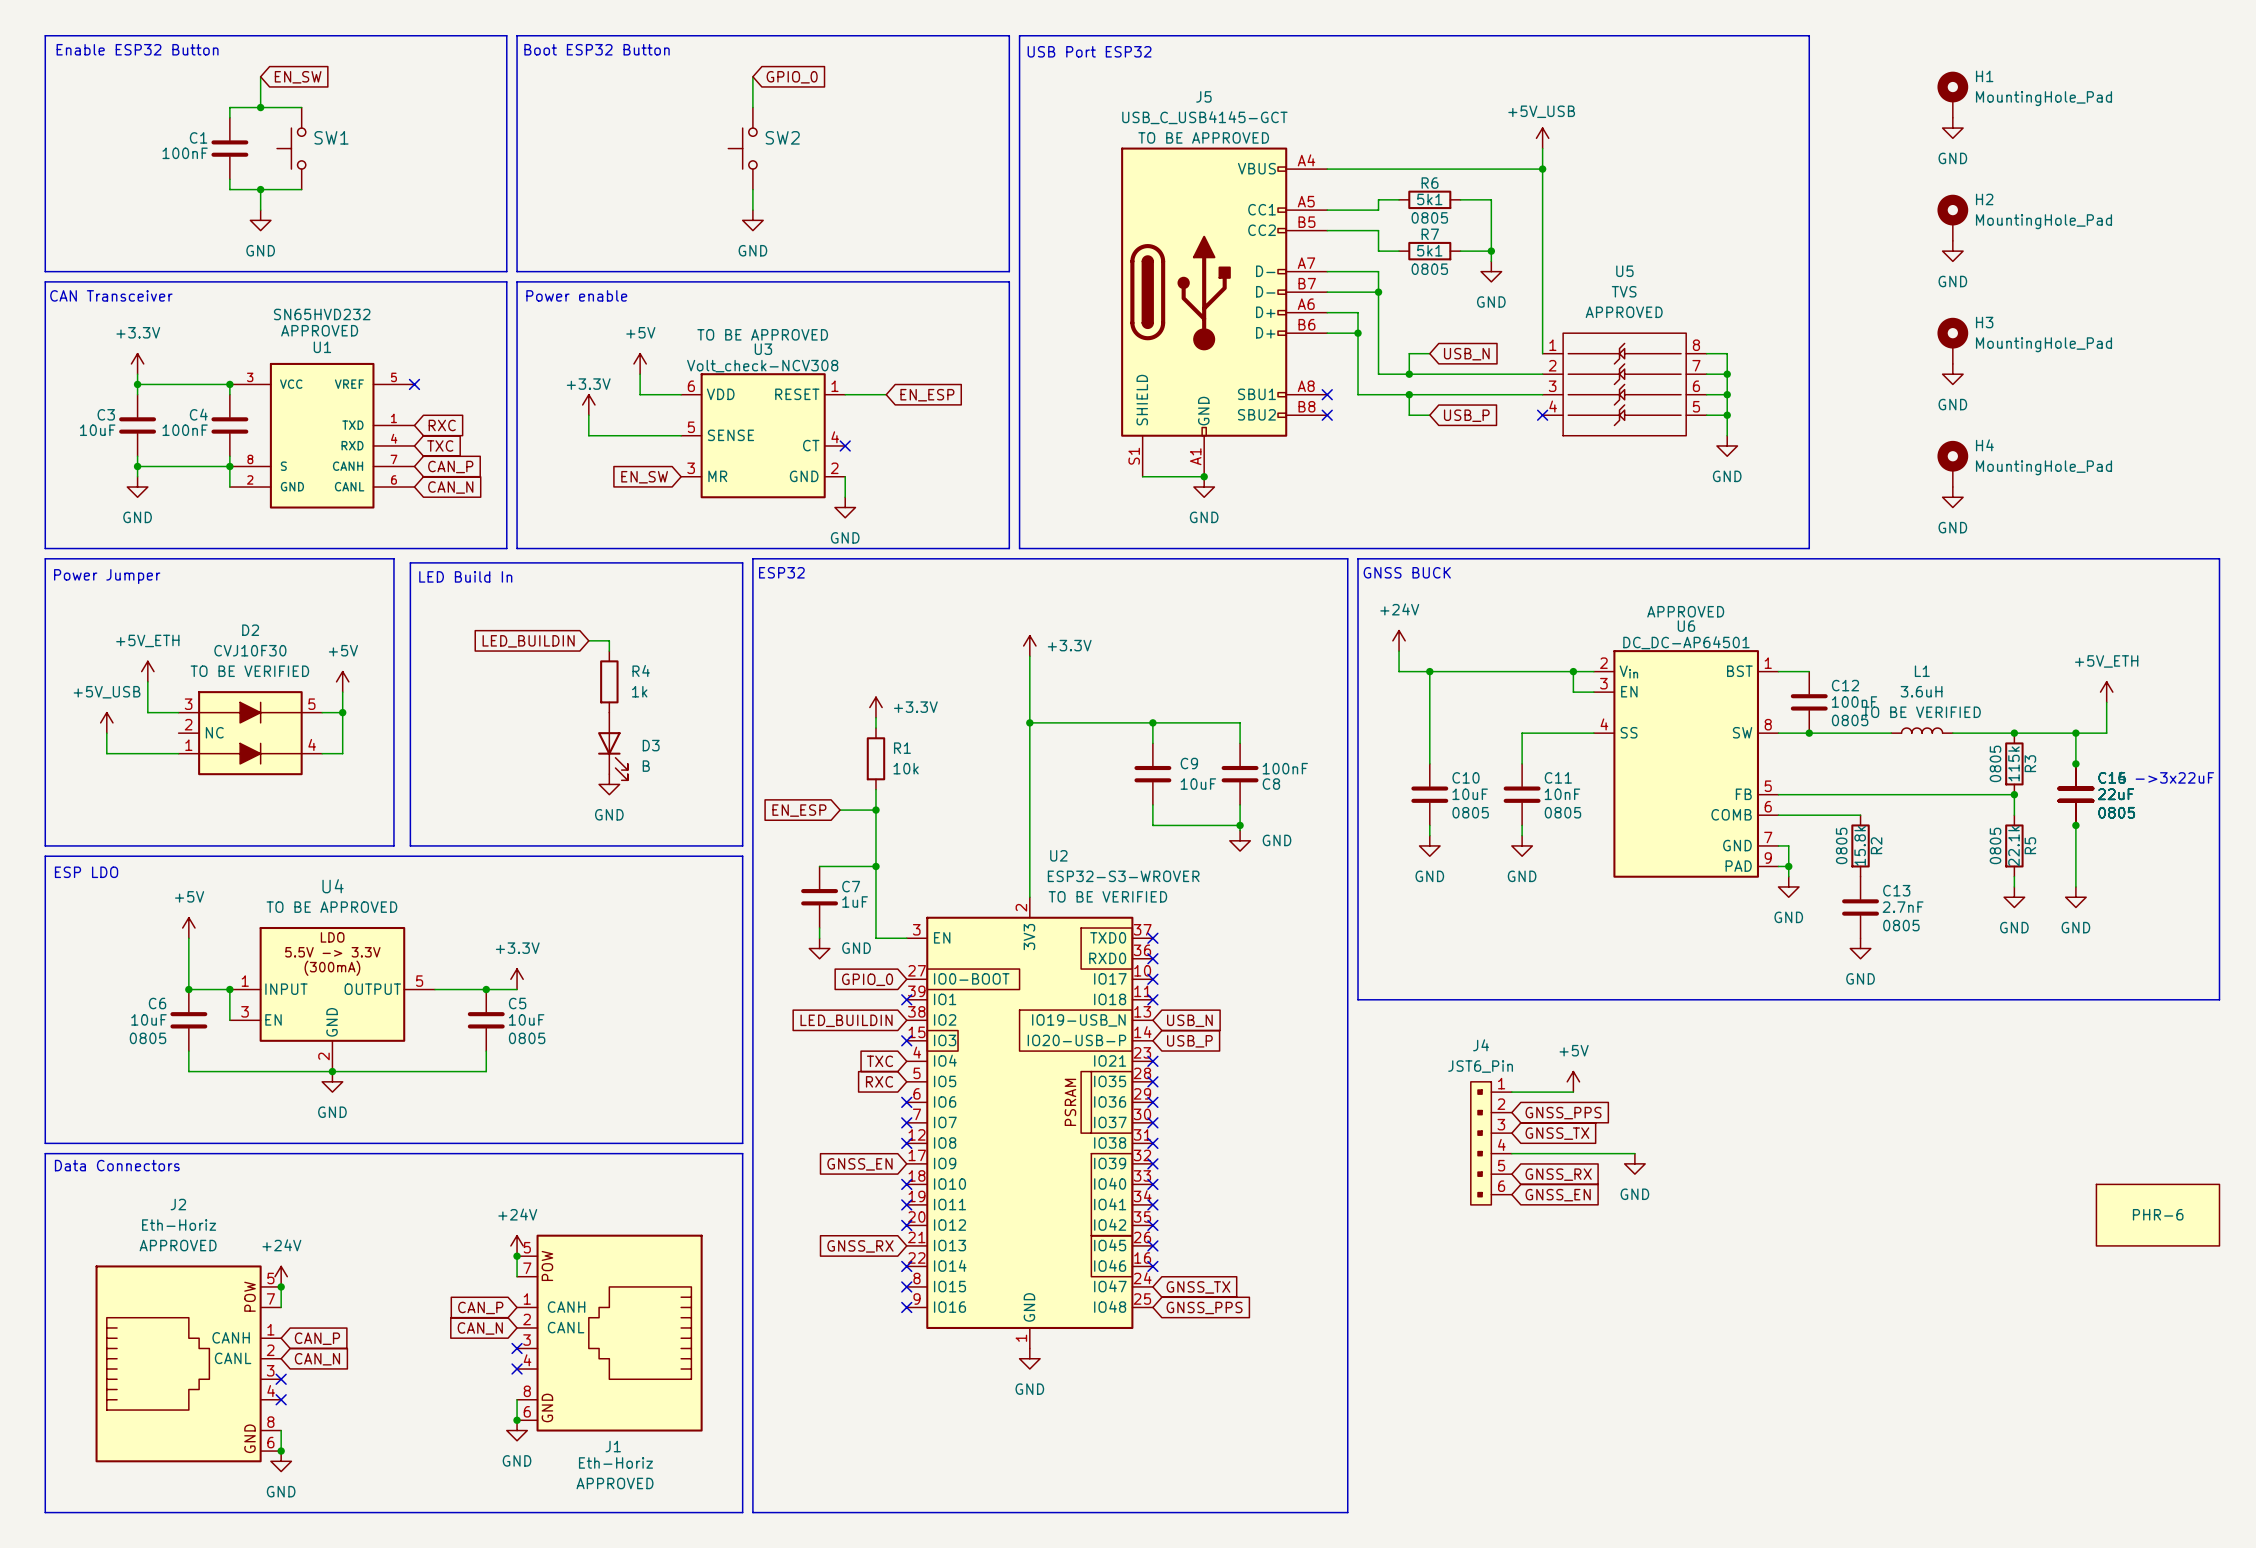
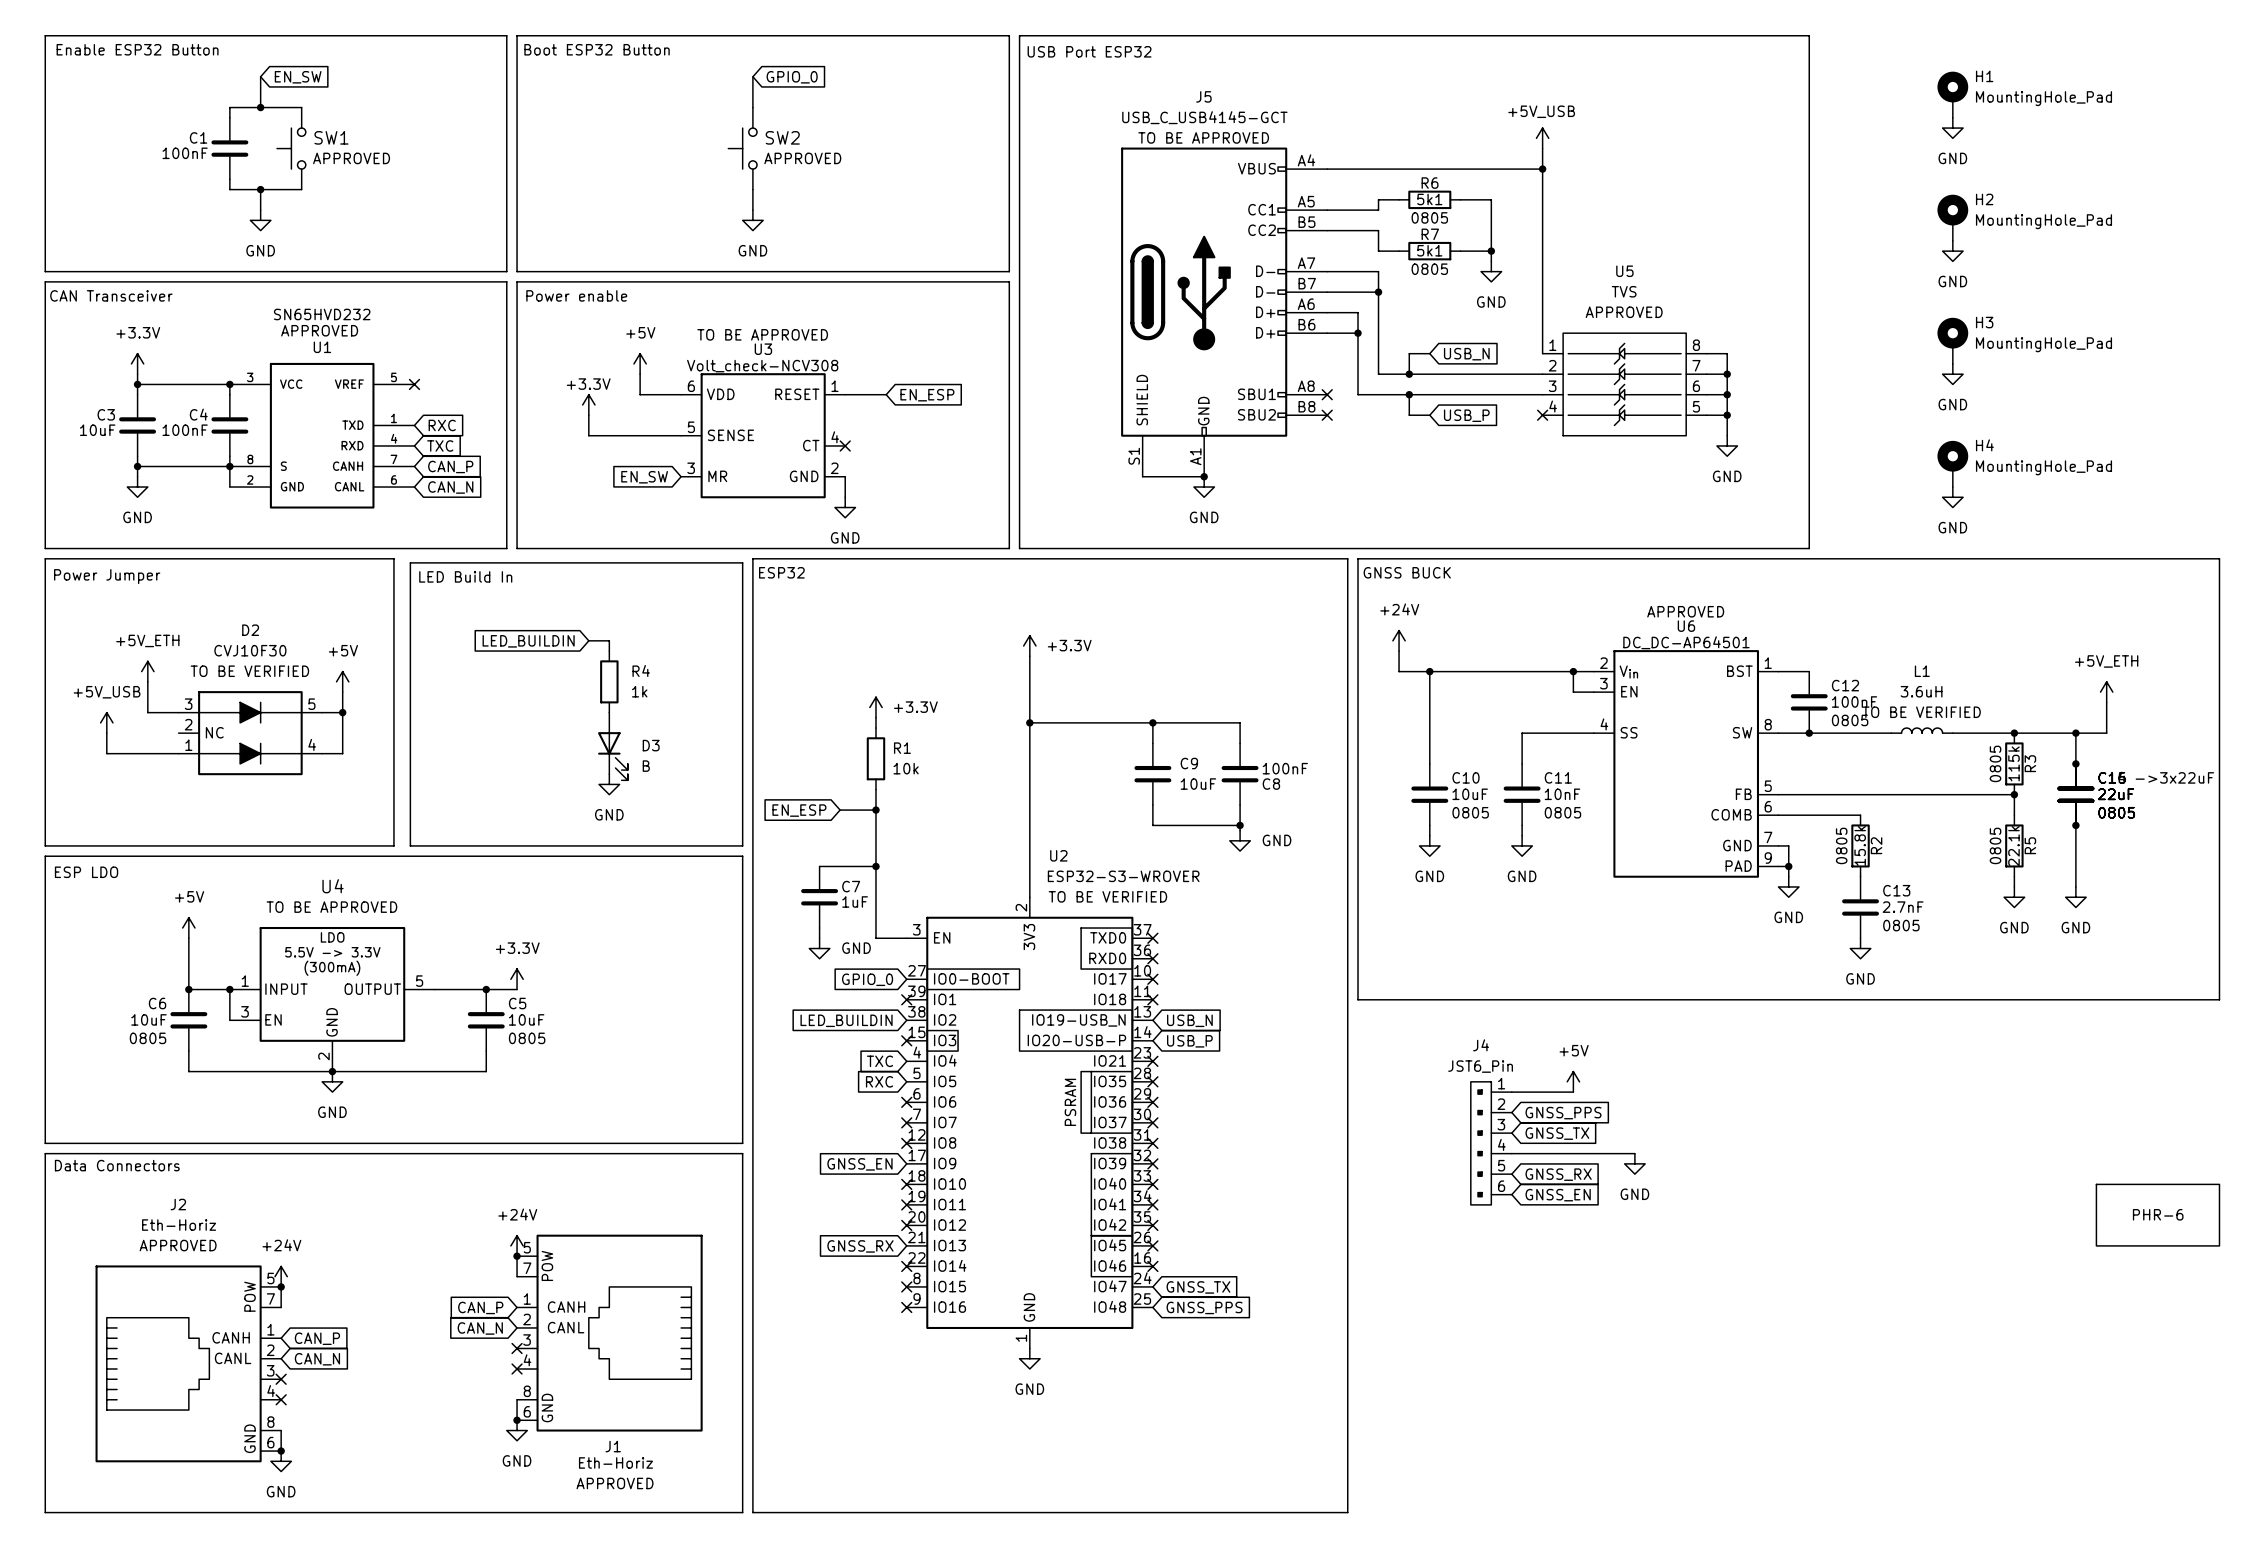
SW1 text: none -> APPROVED (351, 158)
SW2 text: none -> APPROVED (802, 158)

